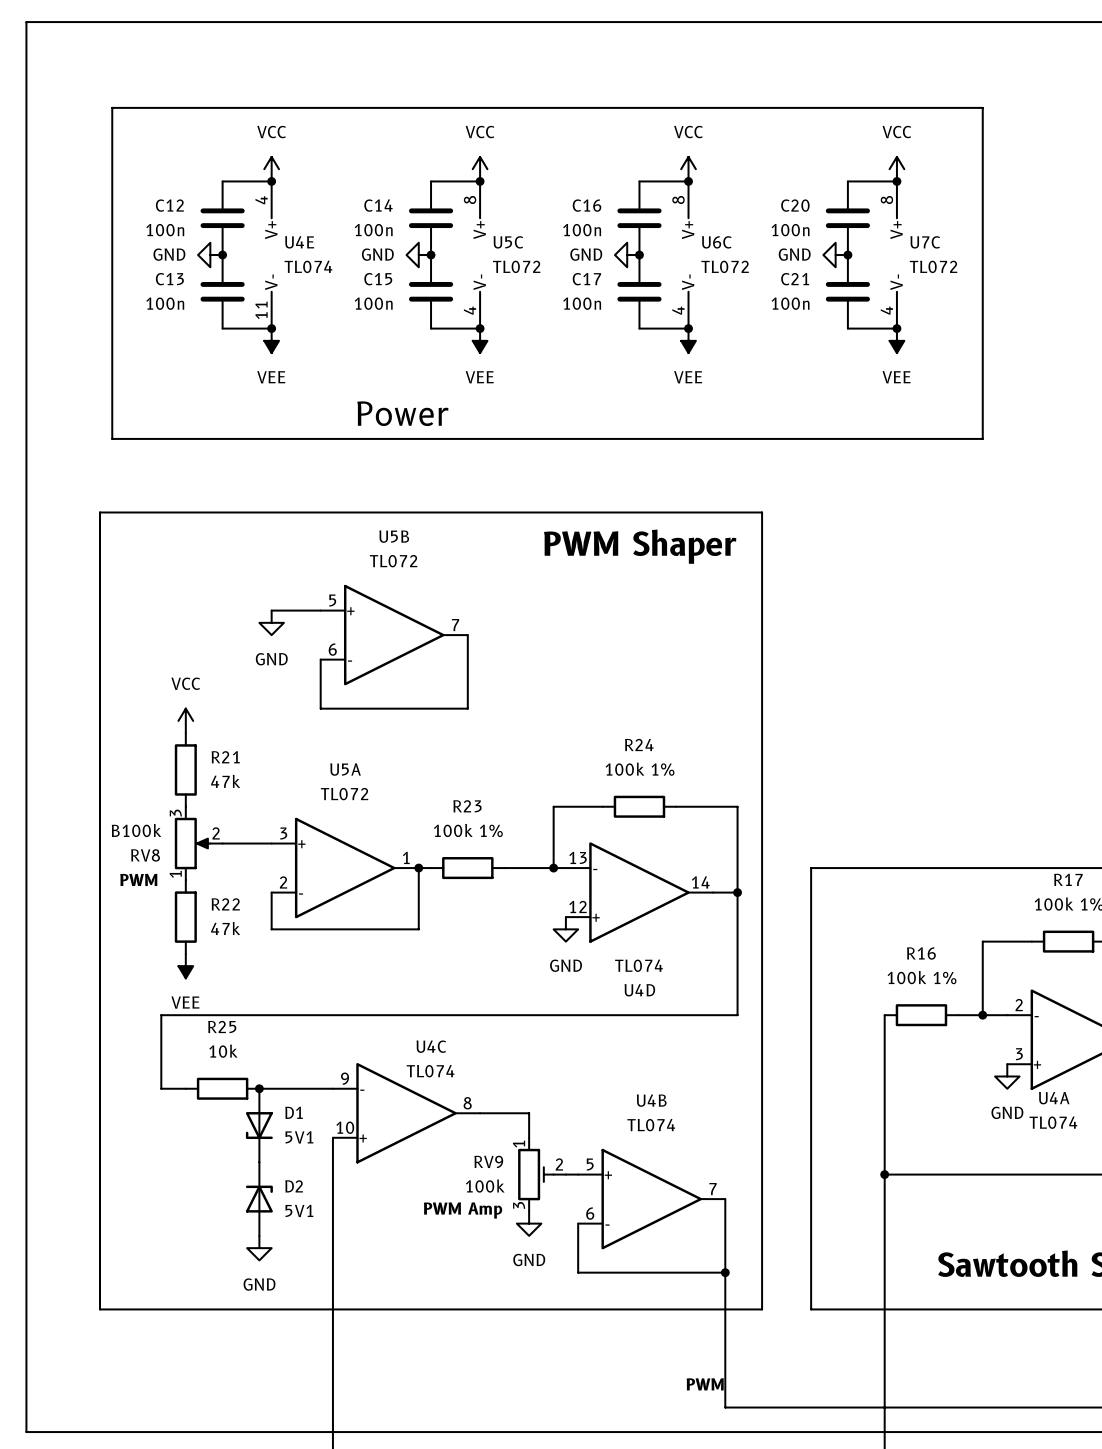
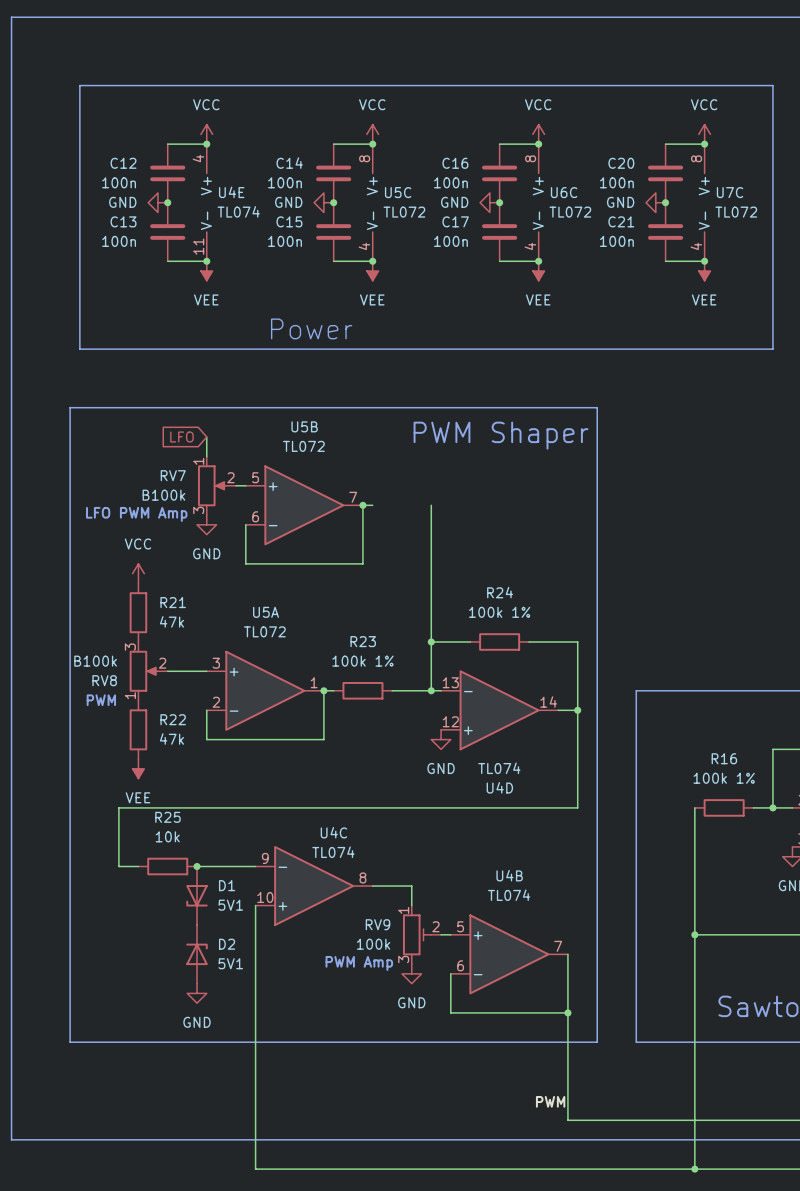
global label: none -> LFO (182, 436)
wire: none -> (206, 436) (206, 456)
RV7: none -> B100k (217, 485)
power symbol position: GND (271, 622) -> GND (206, 524)
wire: none -> (362, 505) (372, 505)
junction: none -> (362, 505)
wire: none -> (431, 505) (431, 641)
text: none -> LFO PWM Amp (136, 514)
junction: none -> (431, 641)

